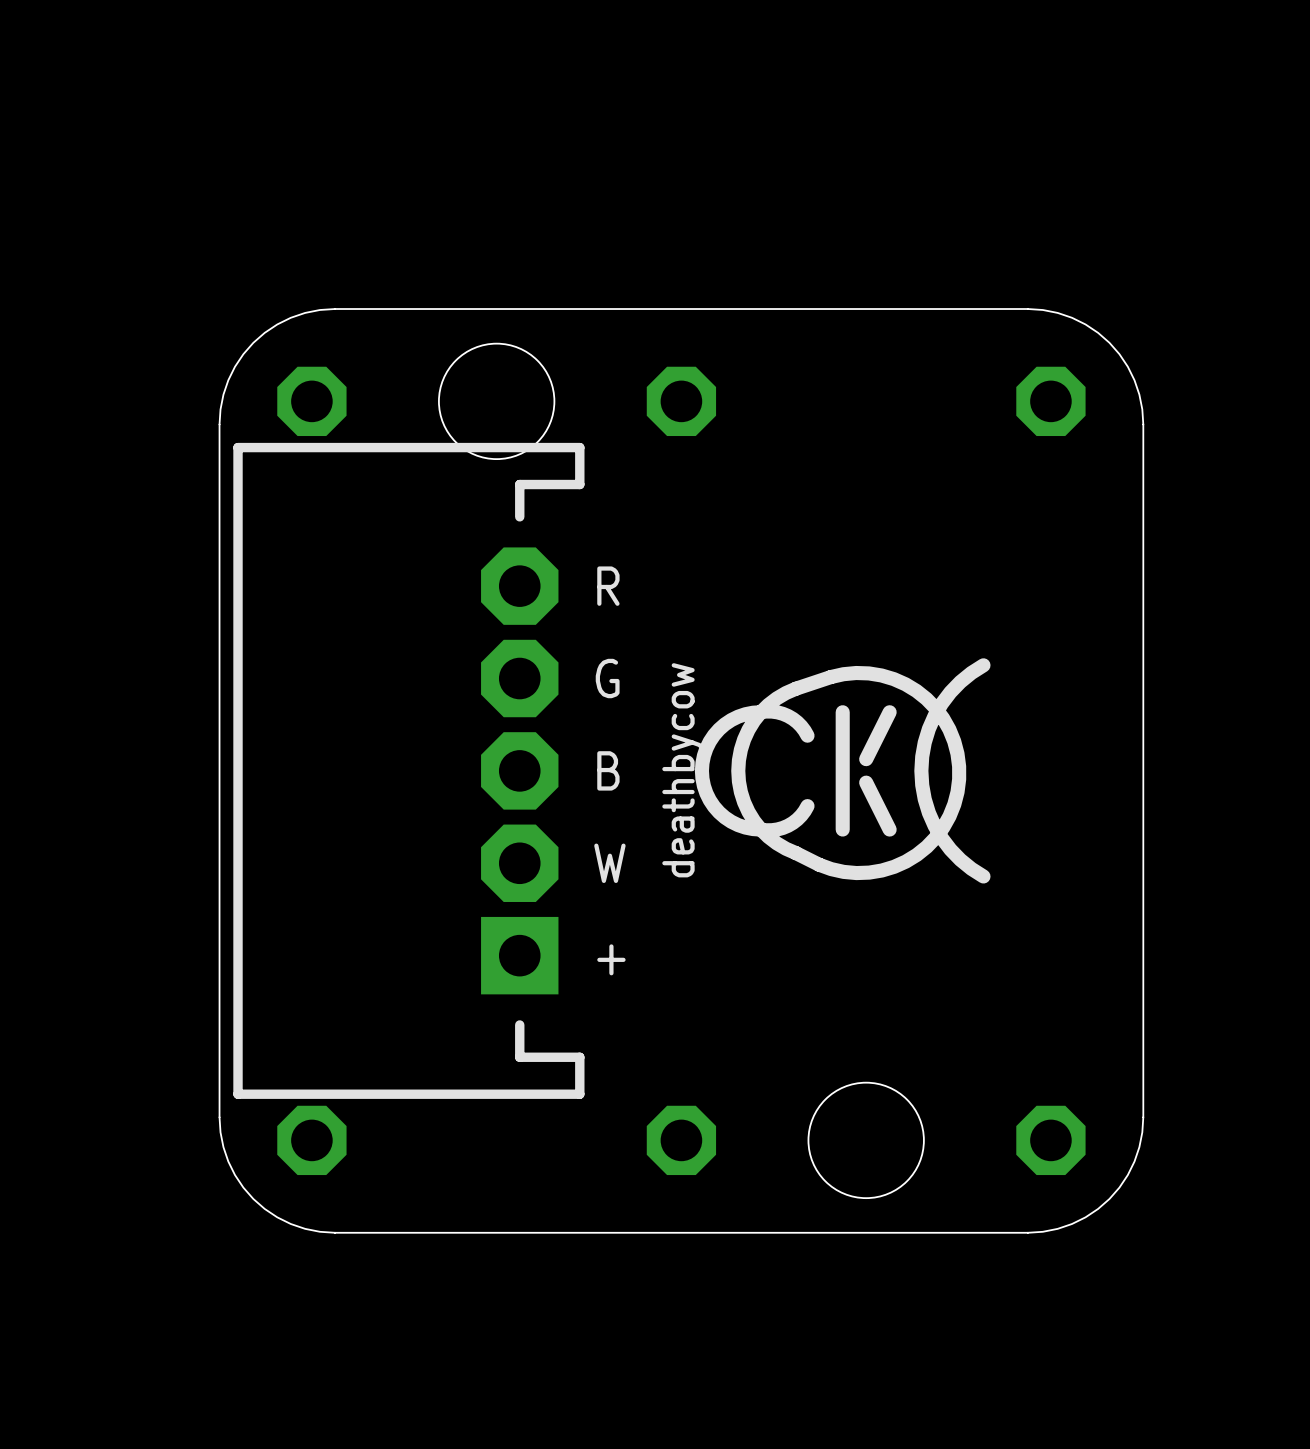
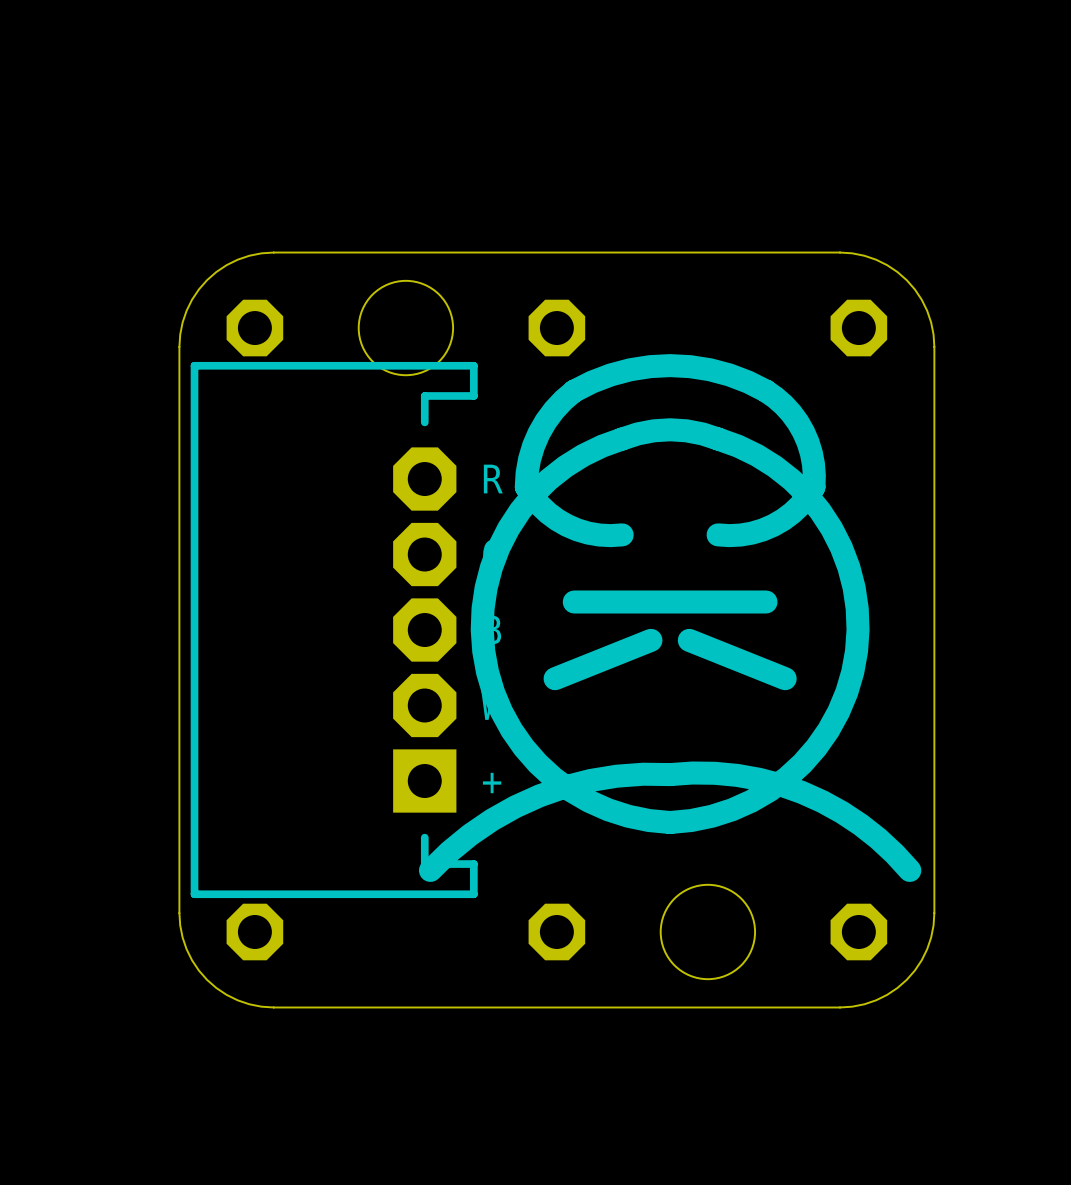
drawing shape: [662, 658, 991, 884] -> [418, 354, 922, 882]

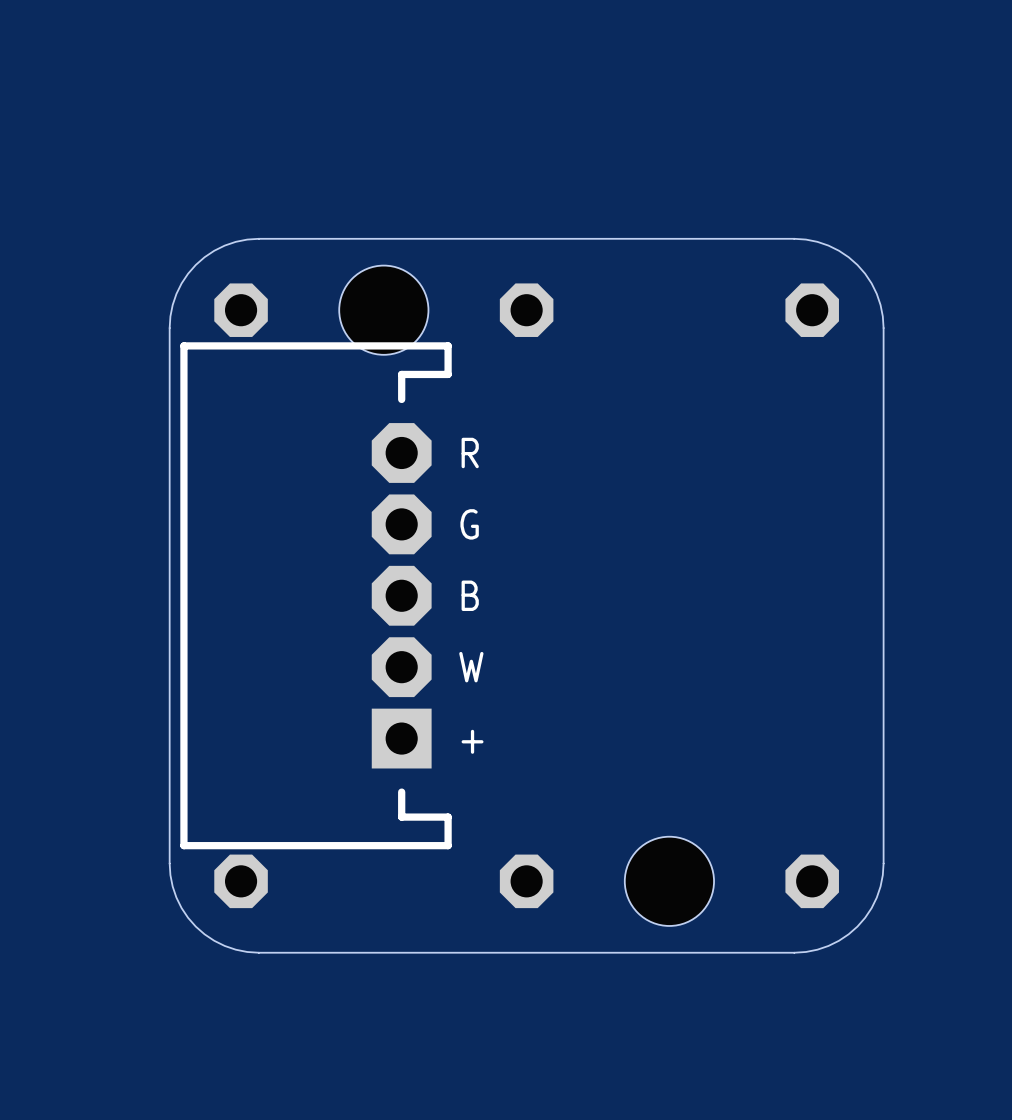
drawing: [418, 354, 922, 882] -> none

